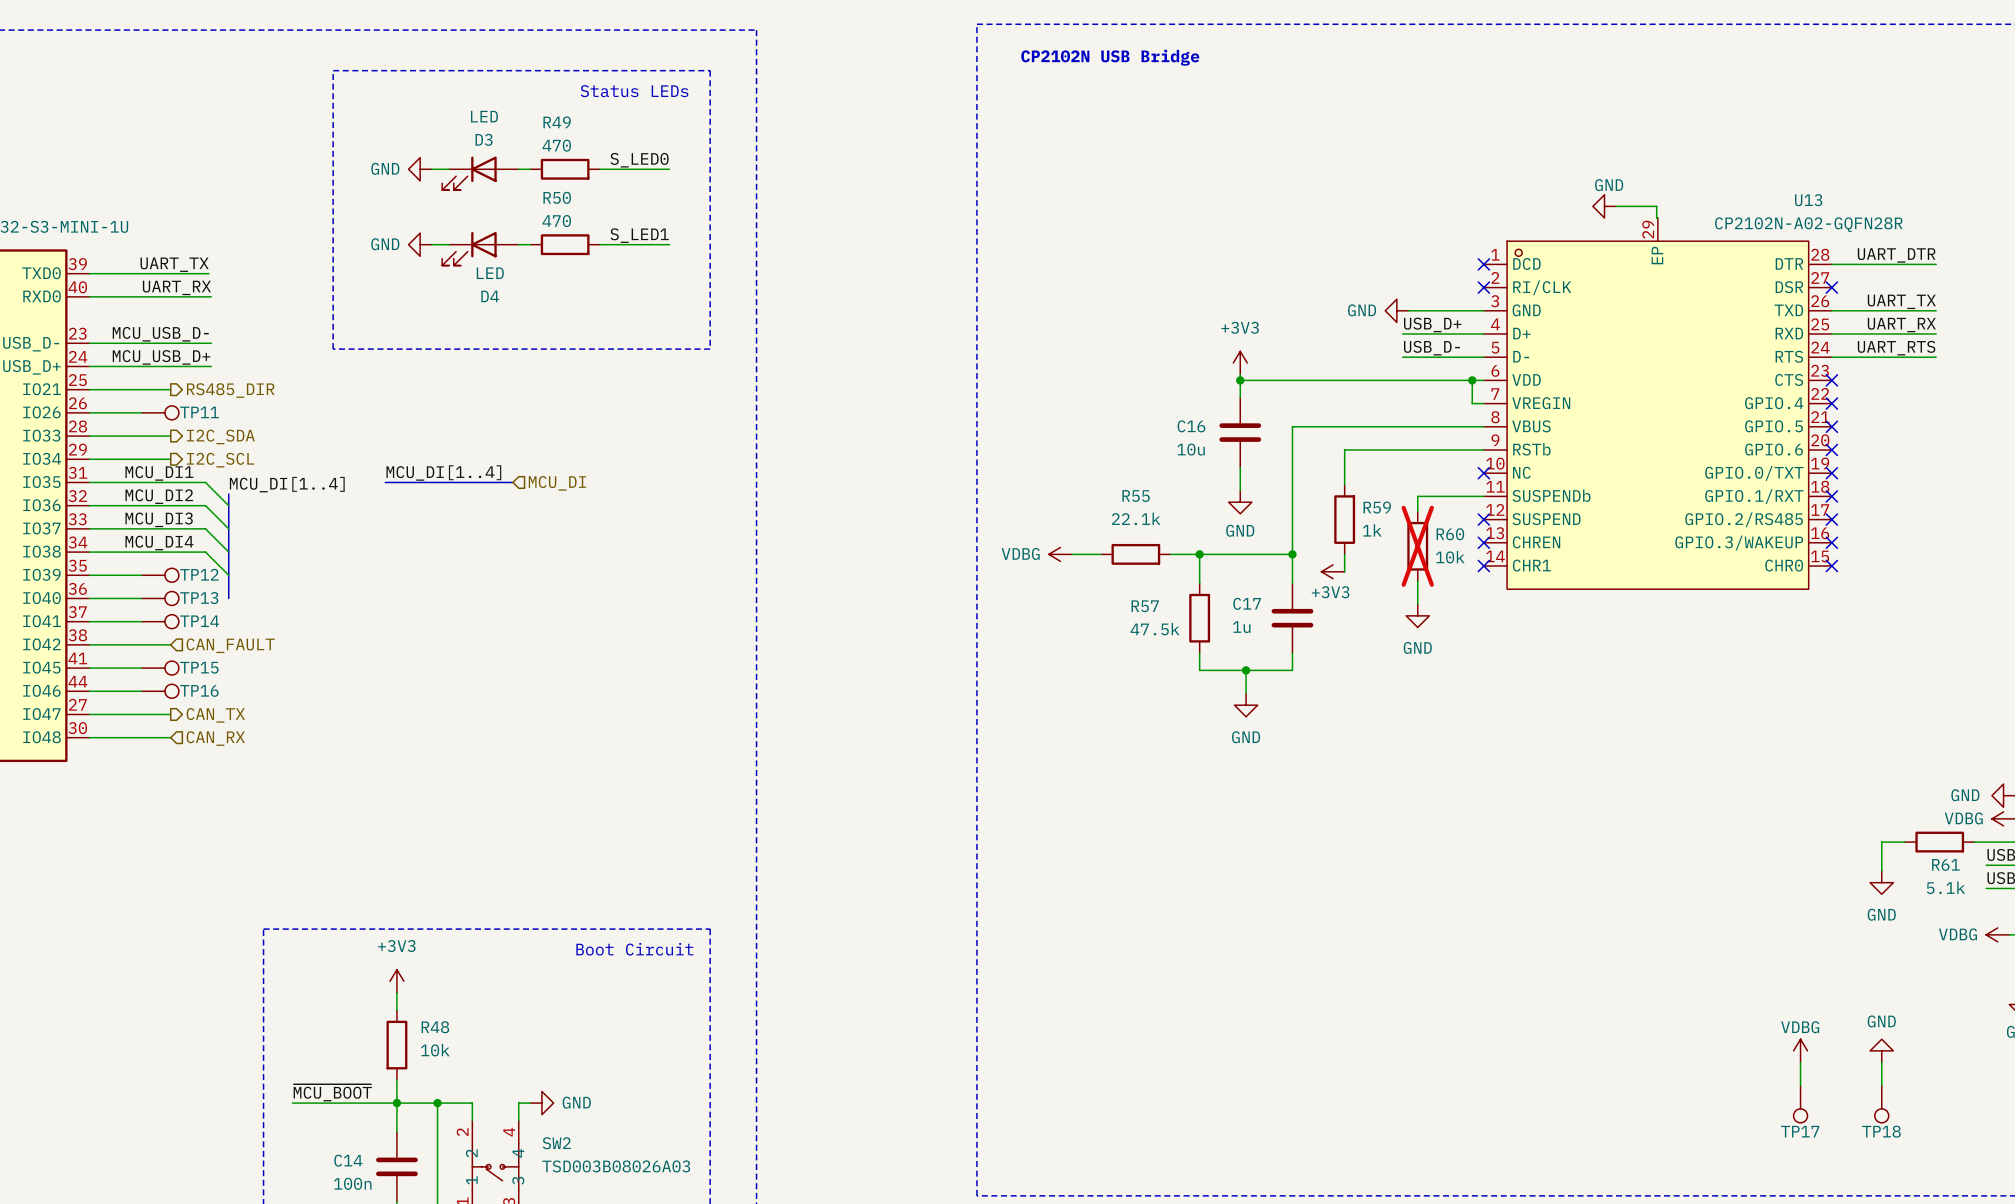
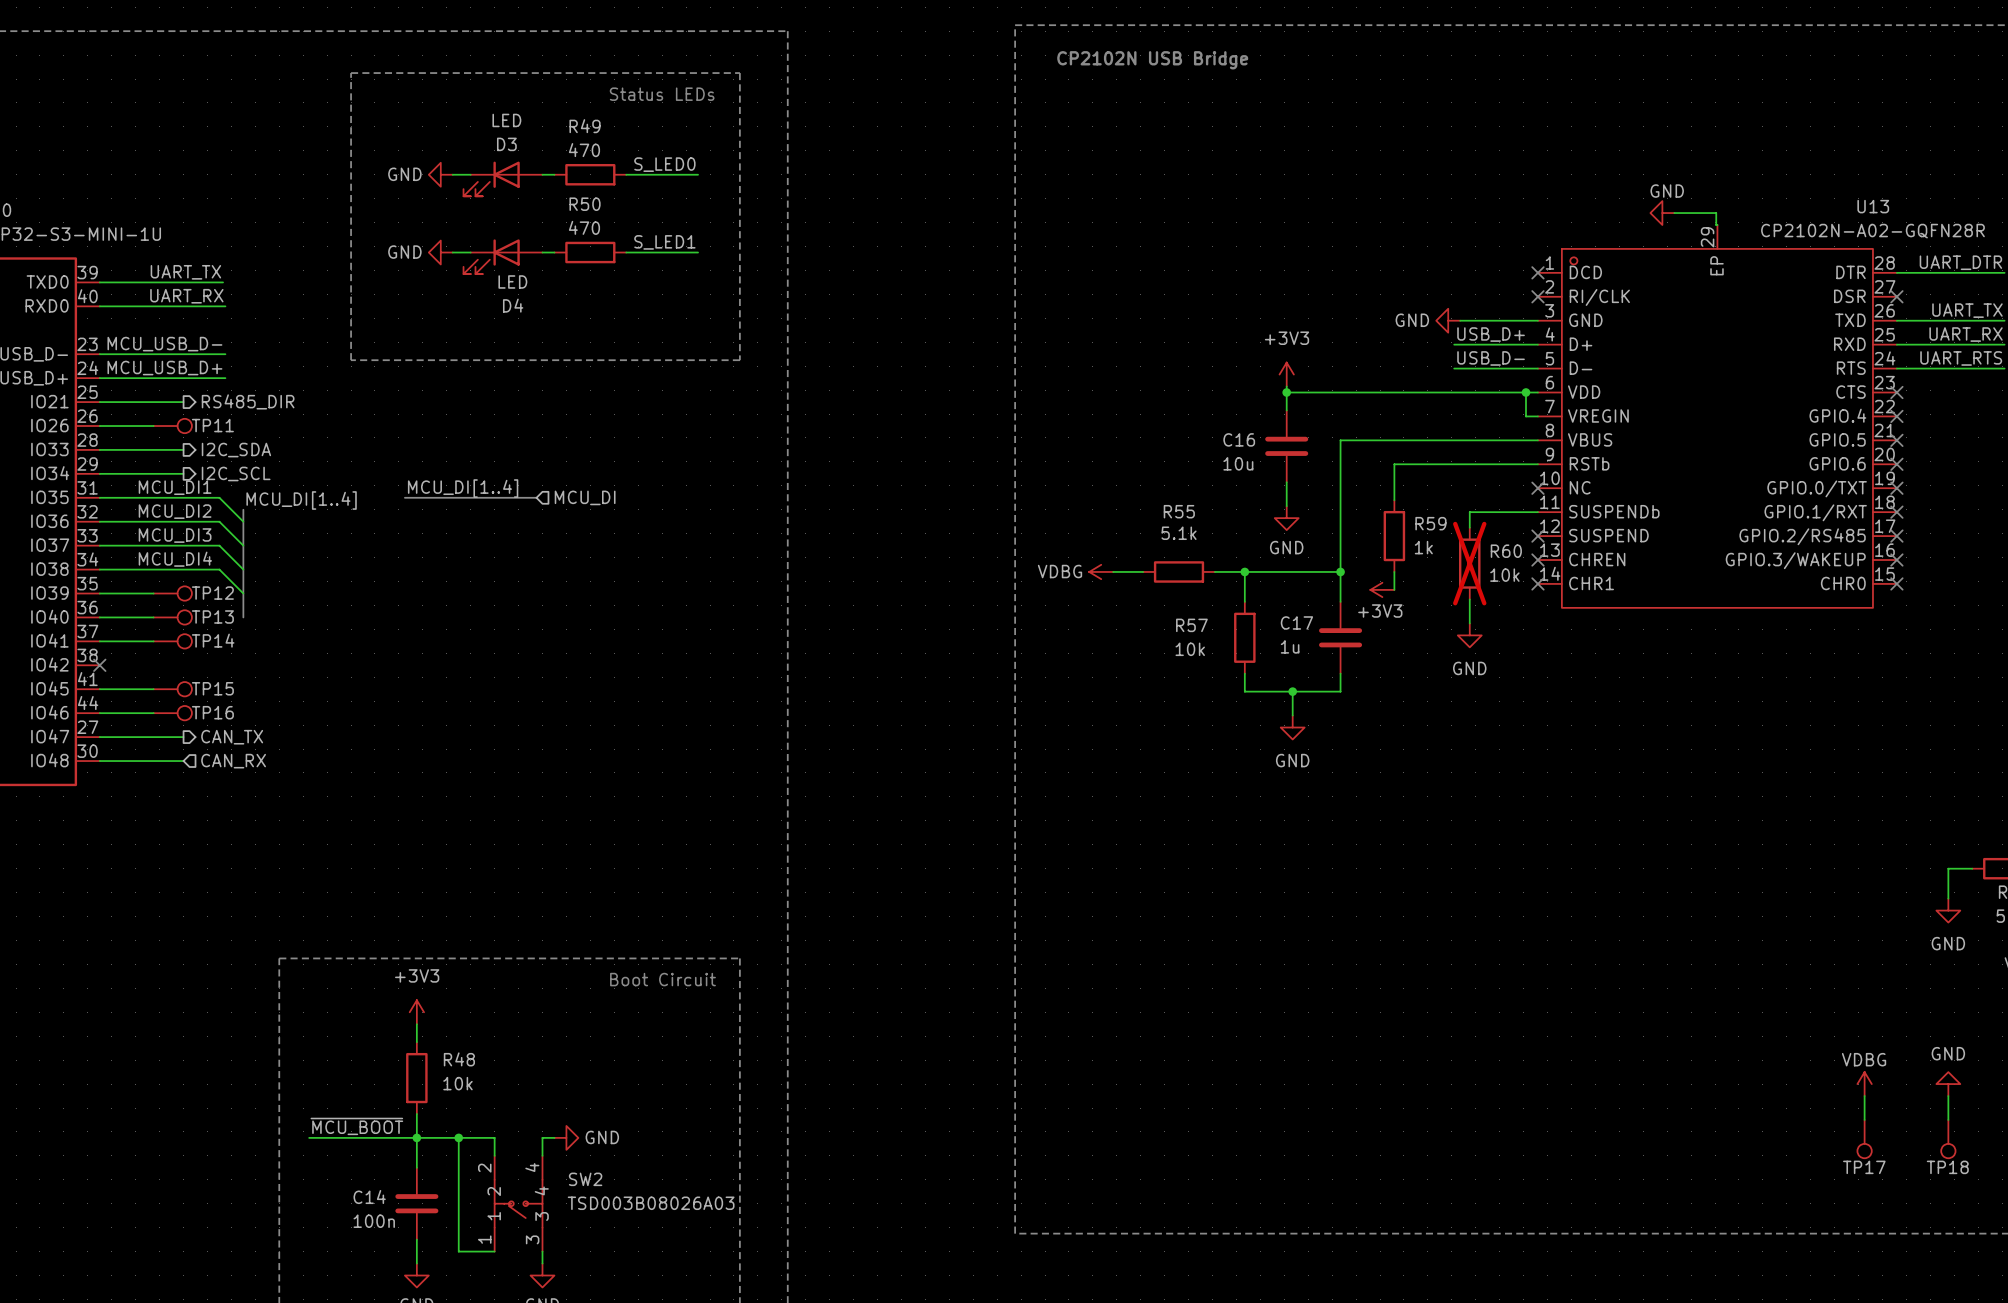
R55 value: 22.1k (1136, 518) -> 5.1k (1179, 533)
R57 value: 47.5k (1155, 629) -> 10k (1190, 649)
wire: (89, 644) (170, 644) -> none
no-connect mark: none -> (99, 665)
hierarchical label: CAN_FAULT (230, 645) -> none

